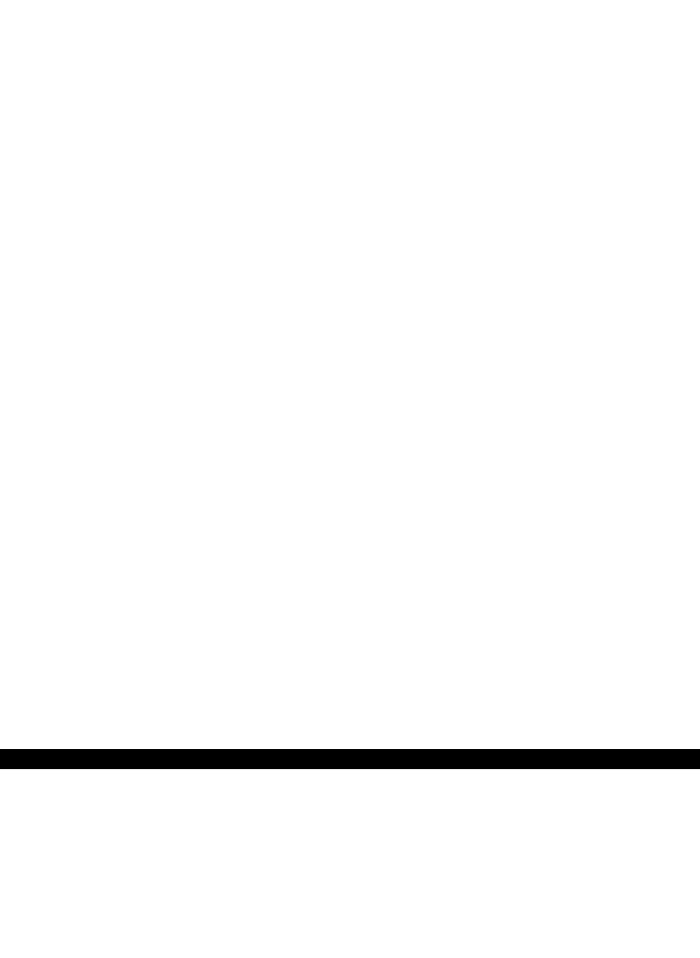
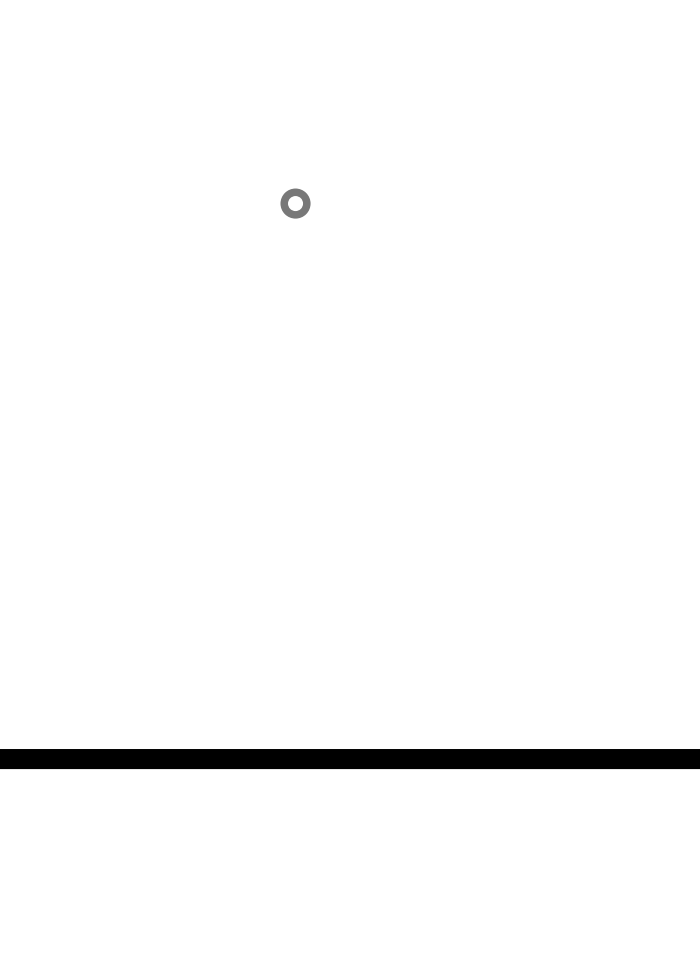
via: none -> (295, 203)

